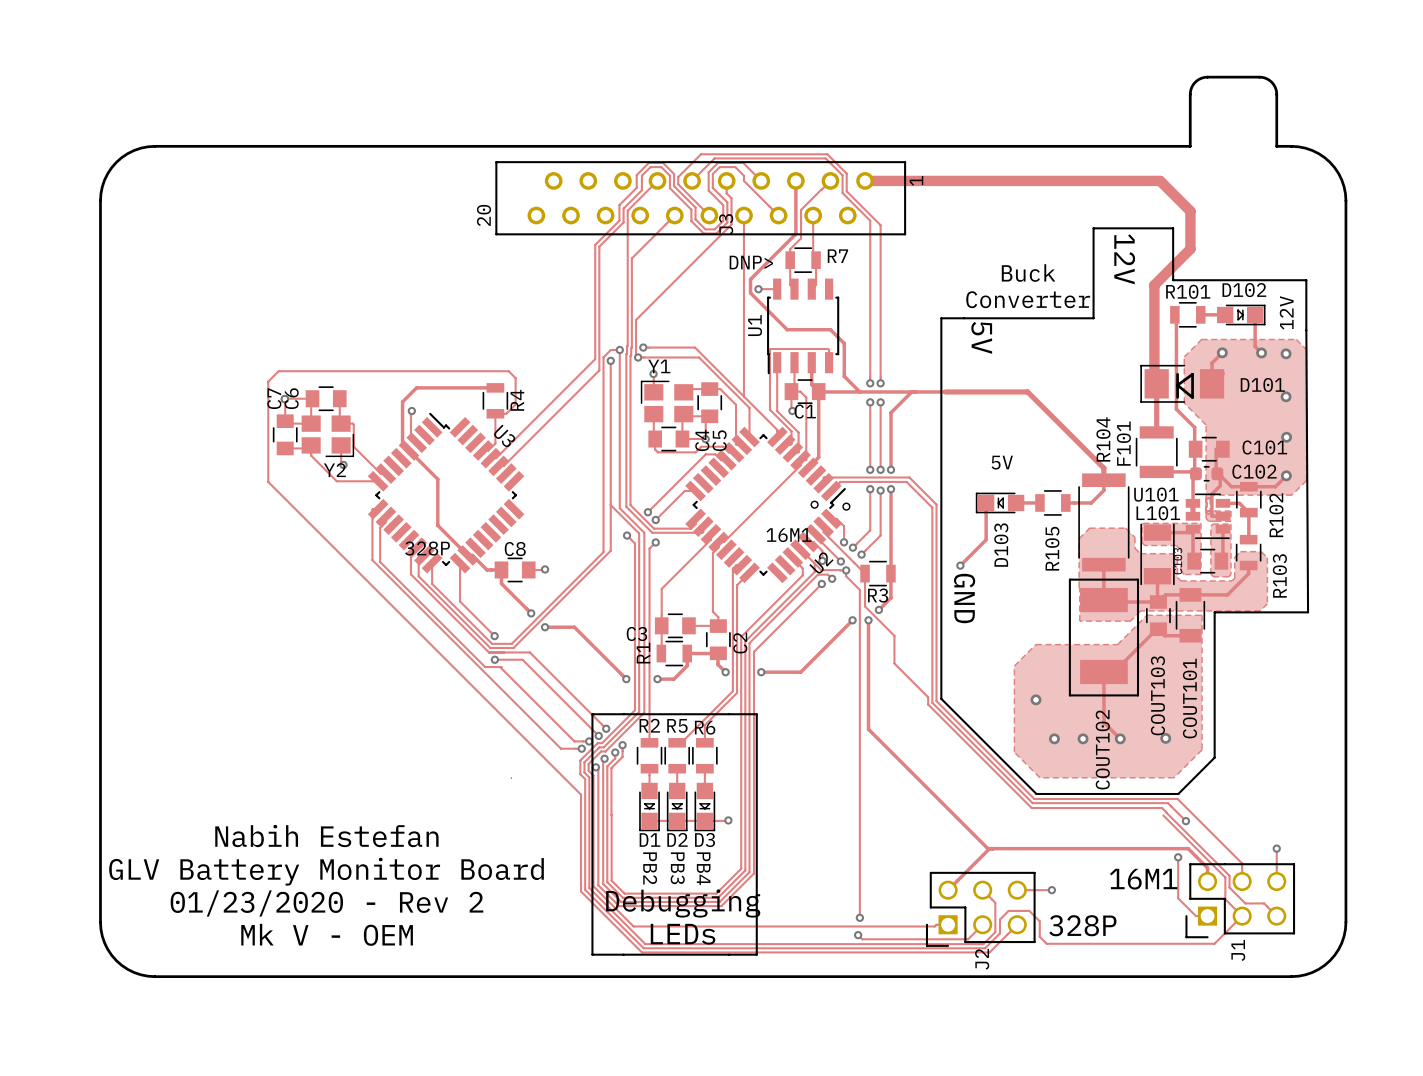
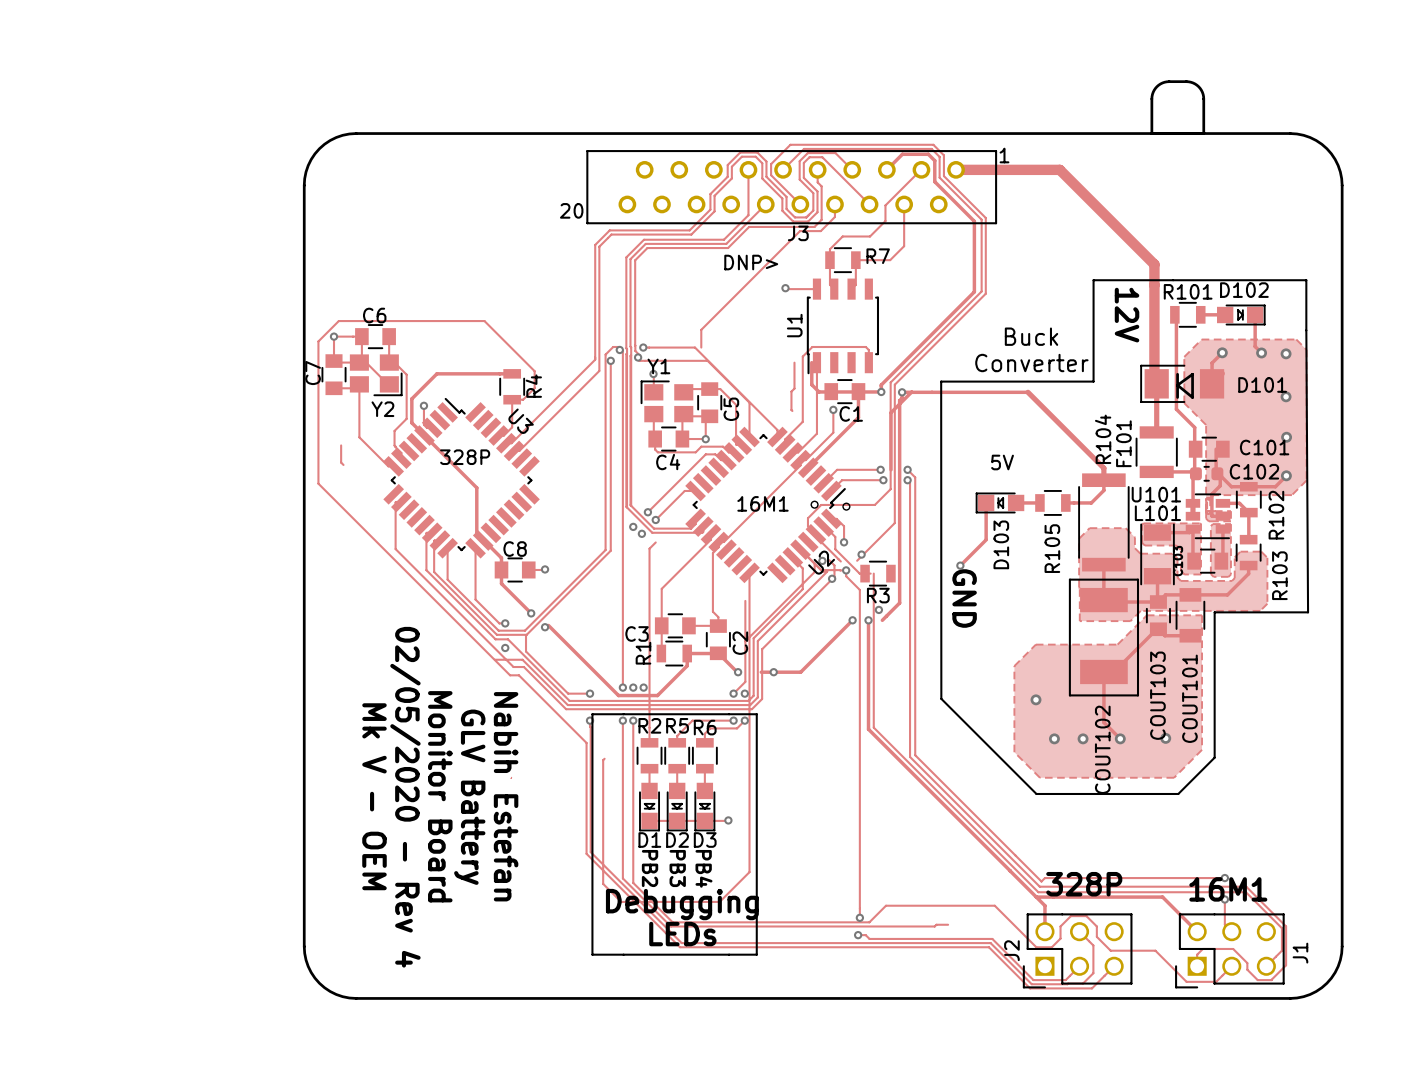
board edge: (1207, 77) (1259, 77) (1269, 80) (1276, 92) (1276, 146) (1305, 148) (1324, 157) (1338, 173) (1345, 193) (1345, 922) (1344, 936) (1338, 949) (1324, 965) (1312, 972) (1291, 976) (154, 976) (140, 974) (127, 969) (111, 955) (102, 936) (100, 922) (100, 200) (104, 179) (111, 167) (121, 157) (140, 148) (154, 146) (1190, 146) (1190, 89) (1197, 80) (1207, 77) -> (356, 133) (336, 137) (319, 148) (308, 165) (304, 185) (304, 946) (308, 966) (314, 978) (324, 987) (342, 996) (356, 998) (1290, 998) (1303, 996) (1316, 991) (1331, 978) (1340, 959) (1342, 946) (1342, 185) (1340, 172) (1335, 159) (1321, 144) (1310, 137) (1290, 133) (356, 133)
board edge: none -> (1151, 133) (1152, 94) (1158, 85) (1169, 81) (1190, 82) (1201, 90) (1203, 98) (1203, 133)
track: none -> (783, 169) (803, 148) (931, 148) (939, 156) (939, 177) (981, 219) (981, 291) (890, 382) (890, 489) (874, 504) (821, 504) (807, 518) (807, 526) (815, 534)
track: none -> (817, 169) (817, 182) (821, 186) (821, 219) (814, 226) (749, 226) (728, 248) (647, 248) (635, 260) (635, 345)
track: none -> (886, 169) (902, 154) (928, 154) (934, 160) (934, 181) (974, 221) (974, 291) (881, 384) (880, 391)
track: none -> (921, 169) (885, 205) (885, 221) (870, 236) (842, 236) (829, 249) (829, 284) (834, 289)
track: (657, 180) (627, 210) (627, 349) -> (748, 169) (748, 215) (723, 239) (644, 239) (626, 257) (627, 349)
track: (692, 180) (714, 158) (825, 158) (842, 175) (842, 193) (870, 220) (870, 383) -> none
track: (726, 180) (726, 193) (731, 198) (731, 224) (636, 320) (636, 355) (638, 357) (699, 357) (749, 407) -> (635, 345) (639, 360) (707, 360) (749, 402) (749, 407)
track: (761, 180) (743, 162) (718, 162) (708, 172) (708, 190) (723, 205) (723, 220) (714, 229) (705, 229) (695, 219) (695, 207) (674, 186) (674, 173) (663, 162) (648, 162) (636, 175) (636, 187) (619, 205) (619, 220) (609, 230) -> (852, 169) (835, 153) (807, 153) (799, 161) (799, 179) (813, 193) (813, 210) (806, 217) (794, 217) (786, 208) (786, 196) (766, 176) (766, 161) (757, 152) (740, 152) (727, 165) (727, 176) (710, 194) (710, 209) (689, 230) (609, 230)
track: (795, 180) (795, 234) (750, 279) (750, 293) (787, 329) (830, 329) (844, 343) (844, 376) (859, 391) -> none
track: (830, 180) (801, 209) (801, 238) (790, 249) (790, 284) (794, 289) -> none
track: (865, 180) (1160, 180) (1190, 211) (1190, 249) (1154, 285) -> (956, 169) (1059, 169) (1154, 264) (1154, 285)
J3 text rotation: 0° (916, 180) -> 90° clockwise (1004, 155)
J3 position: (700, 198) -> (791, 187)
track: none -> (800, 204) (771, 175) (771, 164) (790, 144) (933, 144) (943, 155) (943, 176) (985, 217) (985, 293) (894, 384) (894, 523) (857, 560)
track: none -> (834, 204) (834, 216) (820, 231) (800, 231) (701, 329) (701, 347)
track: none -> (904, 204) (904, 246) (890, 260) (855, 260)
J3 text rotation: 0° (483, 215) -> 90° clockwise (571, 210)
track: (674, 215) (631, 258) (631, 348) -> (765, 204) (726, 243) (645, 243) (630, 259) (631, 348)
track: (709, 215) (678, 184) (678, 177) (701, 154) (827, 154) (846, 173) (846, 191) (880, 225) (880, 383) -> none
track: (743, 215) (743, 396) -> none
track: (778, 215) (743, 180) (743, 175) (735, 167) (719, 167) (712, 174) (712, 187) (727, 202) (727, 222) (716, 233) (703, 233) (691, 221) (691, 209) (669, 188) (669, 175) (661, 167) (650, 167) (641, 175) (641, 190) (623, 208) (623, 222) (611, 234) -> (869, 204) (822, 157) (809, 157) (803, 162) (803, 177) (817, 191) (817, 212) (808, 221) (793, 221) (782, 210) (782, 198) (762, 178) (762, 163) (755, 156) (741, 156) (731, 166) (731, 178) (714, 195) (714, 211) (691, 234) (611, 234)
track: (813, 215) (813, 257) (816, 260) (816, 284) (811, 289) -> none
J3 name rotation: 0° (726, 224) -> 90° clockwise (798, 233)
text position: 12V (1124, 259) -> 12V (1127, 315)
R7 position: (803, 260) -> (842, 260)
track: none -> (855, 260) (855, 284) (851, 289)
text position: Buck (1028, 273) -> Buck (1031, 336)
line: (1093, 280) (1093, 228) (1173, 228) (1173, 280) -> (1093, 280) (1173, 280)
track: none -> (785, 288) (816, 289)
track: (758, 289) (777, 289) -> none
via position: (758, 289) -> (785, 288)
text position: Converter (1028, 299) -> Converter (1031, 363)
text: 12V (1286, 312) -> none
line: (1093, 318) (941, 318) (941, 698) -> (1093, 318) (1093, 381) (941, 381) (941, 698)
U1 position: (803, 326) -> (842, 326)
via: none -> (334, 336)
track: none -> (389, 336) (389, 362) (394, 362) (406, 374) (406, 418) (394, 430) (394, 445) (401, 452) (401, 458)
text: 5V (981, 337) -> none
track: (595, 359) (496, 458) (490, 458) -> (595, 359) (511, 443) (506, 443)
track: none -> (359, 362) (361, 360) (361, 336) (334, 336) (335, 362) (366, 362) (389, 384)
track: (777, 362) (777, 411) (798, 432) (798, 451) -> (816, 362) (816, 433) (798, 451)
track: (829, 362) (828, 349) (769, 349) (769, 409) (791, 431) (791, 443) (785, 444) -> (868, 362) (868, 350) (865, 346) (812, 346) (802, 356) (802, 421) (785, 439) (785, 444)
track: (599, 370) (503, 465) (498, 465) -> (599, 370) (519, 450) (514, 450)
via: (870, 383) -> none
via: (880, 383) -> none
track: (495, 387) (416, 387) (402, 401) (402, 444) (437, 479) (437, 525) (467, 555) (472, 555) (487, 569) (501, 569) -> (512, 373) (436, 373) (411, 398) (411, 422) (476, 487) (476, 534) (501, 558) (501, 569)
track: none -> (334, 388) (355, 388) (359, 384) (359, 437) (388, 466) (393, 466)
track: (791, 391) (800, 391) (806, 397) (806, 459) -> (833, 409) (833, 432) (806, 459)
C1 position: (805, 391) -> (844, 391)
track: (818, 391) (818, 457) -> (858, 391) (858, 417) (818, 457)
track: (881, 391) (1028, 392) -> (882, 620) (899, 603) (899, 400) (902, 398) (902, 392) (1028, 392)
via: none -> (881, 391)
via: none -> (902, 392)
C7 name position: C7 (274, 398) -> C7 (313, 373)
track: (285, 398) (285, 421) (287, 423) (311, 423) (312, 398) (285, 398) -> none
C6 name rotation: 0° (291, 398) -> 90° clockwise (374, 315)
C6 name position: C6 (291, 398) -> C6 (374, 315)
C6 position: (326, 398) -> (375, 336)
track: (339, 398) (339, 422) (353, 424) (353, 446) (380, 473) (385, 473) -> none
via: (284, 399) -> none
R4 position: (495, 400) -> (512, 386)
track: (870, 402) (870, 469) -> none
via: (870, 402) -> none
track: (880, 402) (880, 469) -> none
via: (880, 402) -> none
track: none -> (423, 405) (423, 424) (426, 427) (432, 427)
via: none -> (833, 409)
track: (411, 411) (410, 436) (416, 442) -> none
via position: (411, 411) -> (423, 405)
via: (792, 411) -> none
C1 name position: C1 (805, 411) -> C1 (851, 413)
C7 position: (285, 434) -> (334, 374)
track: none -> (498, 435) (503, 435) (512, 427) (512, 399) (523, 399) (534, 388) (534, 371) (484, 321) (338, 321) (318, 341) (318, 483) (510, 675) (518, 675) (586, 742) (586, 853) (679, 947) (988, 947) (1030, 988) (1092, 988) (1114, 966)
Y2 position: (327, 436) -> (376, 375)
C4 name rotation: 0° (702, 440) -> 90° clockwise (668, 462)
C4 name position: C4 (702, 440) -> C4 (668, 462)
C5 name position: C5 (719, 440) -> C5 (731, 409)
track: (285, 448) (308, 448) (311, 445) (311, 455) (336, 481) (378, 481) -> none
track: (483, 450) (488, 450) (495, 443) (495, 413) (506, 413) (515, 404) (515, 378) (508, 371) (278, 371) (268, 381) (268, 481) (581, 794) (581, 891) (641, 952) (989, 952) (1017, 924) -> none
via: (343, 464) -> none
via: (870, 469) -> none
via: (891, 469) -> none
track: none -> (907, 469) (915, 477) (915, 755) (1041, 881) (1044, 878) (1224, 878)
via: none -> (907, 469)
via: none -> (883, 480)
track: none -> (907, 480) (910, 482) (910, 756) (1039, 886) (1246, 886) (1286, 926) (1286, 965) (1271, 980) (1257, 980) (1247, 969) (1247, 963) (1233, 948) (1202, 948) (1197, 954) (1197, 966)
via: none -> (907, 480)
track: (840, 481) (906, 481) (932, 507) (932, 702) (1032, 803) (1167, 803) (1185, 821) -> (840, 481) (842, 480) (883, 480)
track: (823, 483) (824, 477) (909, 477) (936, 504) (936, 701) (1034, 799) (1177, 799) (1242, 863) (1242, 881) -> (823, 483) (837, 469) (883, 469)
track: (870, 489) (870, 530) (852, 547) -> none
via: (870, 489) -> none
track: (891, 489) (891, 573) -> none
via: (891, 489) -> none
track: (880, 490) (880, 535) (861, 554) -> none
via: (880, 490) -> none
U3 position: (446, 493) -> (461, 478)
track: none -> (401, 501) (395, 502) (395, 549) (513, 667) (523, 667) (566, 709) (751, 709) (762, 699) (762, 649) (834, 576) (834, 565) (829, 560)
track: (610, 505) (639, 533) (639, 711) (603, 747) (599, 747) (584, 762) (584, 772) (589, 777) (589, 888) (645, 944) (983, 944) (995, 932) (995, 902) (982, 890) -> none
track: (378, 509) (372, 509) (372, 560) (561, 748) (581, 748) -> none
track: (385, 516) (385, 522) (380, 527) (380, 561) (485, 667) (501, 667) -> none
via: none -> (633, 526)
track: (823, 526) (823, 532) (865, 573) (865, 606) (894, 635) (894, 663) (928, 697) (928, 704) (1031, 807) (1162, 807) (1229, 875) (1229, 887) (1245, 903) (1264, 903) (1276, 916) -> (823, 526) (835, 536) (835, 549) (859, 573) (870, 573)
via: none -> (641, 533)
track: (627, 535) (634, 543) (634, 710) (602, 743) (597, 743) (580, 760) (580, 774) (585, 779) (585, 889) (643, 948) (985, 948) (999, 933) (999, 919) (1008, 910) (1029, 910) (1039, 921) (1039, 936) (1046, 943) (1214, 943) (1242, 916) (1225, 899) (1225, 877) (1163, 815) -> none
via: (627, 535) -> none
text position: 16M1 (789, 535) -> 16M1 (763, 503)
track: none -> (439, 540) (434, 540) (434, 572) (496, 634) (526, 634)
via: (655, 542) -> none
track: (808, 542) (813, 542) (822, 550) (822, 560) -> none
track: (416, 547) (410, 548) (410, 574) (488, 652) (529, 652) (606, 728) -> none
via: (852, 547) -> none
text position: 328P (427, 548) -> 328P (465, 457)
track: none -> (475, 548) (475, 599) (499, 623) (505, 623)
track: (603, 552) (603, 357) (610, 349) (619, 349) (619, 508) (644, 532) (644, 712) (605, 751) (601, 751) (588, 763) (588, 770) (593, 775) (593, 886) (633, 926) (670, 926) -> (622, 720) (622, 878) (670, 926)
track: none -> (603, 552) (605, 550) (605, 354) (613, 346) (619, 346) (622, 350) (622, 687)
track: (424, 555) (418, 555) (418, 576) (490, 647) (513, 647) (526, 635) -> (590, 693) (568, 693) (526, 651) (526, 635)
via: (840, 561) -> none
track: (432, 563) (432, 583) (492, 643) (511, 643) (524, 630) -> (447, 548) (447, 579) (498, 630) (524, 630)
track: (460, 563) (460, 601) (494, 636) -> none
track: (741, 565) (736, 565) (732, 568) (732, 691) (681, 742) -> none
track: (749, 572) (737, 585) (737, 692) (704, 725) (704, 733) -> (744, 720) (737, 728) (710, 728) (704, 733)
track: none -> (873, 573) (873, 727) (1038, 892) (1245, 892) (1281, 928) (1281, 950) (1266, 966)
track: (890, 573) (890, 597) (878, 609) -> none
track: (802, 575) (741, 636) (741, 868) (716, 893) (624, 893) (611, 880) (611, 814) -> (802, 575) (802, 589) (753, 638) (753, 695) (748, 700) (569, 700) (507, 639) (495, 639) (426, 570) (426, 533) (432, 532)
track: (832, 578) (827, 574) (817, 574) (749, 643) -> (749, 572) (749, 643)
track: (821, 583) (754, 651) (754, 873) (721, 906) (619, 906) (598, 885) (598, 769) (595, 767) -> none
via: (821, 583) -> none
via: none -> (505, 623)
track: (545, 627) (574, 627) (626, 679) -> none
via: (494, 636) -> none
via: none -> (505, 647)
track: (718, 653) (718, 664) (725, 672) -> (718, 653) (738, 672)
via: (494, 659) -> none
track: (500, 667) (574, 741) (589, 741) -> none
via: (725, 672) -> none
via: none -> (738, 672)
via: (761, 672) -> none
via: none -> (773, 672)
via: (626, 679) -> none
track: (657, 679) (673, 679) -> (548, 625) (618, 695) (657, 695) (673, 679)
via: (657, 679) -> none
track: (745, 681) (745, 870) (718, 897) (622, 897) (607, 882) (607, 766) (615, 758) (615, 752) -> (745, 681) (733, 693)
via: none -> (622, 687)
via: none -> (633, 687)
via: none -> (643, 687)
via: none -> (590, 693)
via: none -> (733, 693)
via: none -> (744, 693)
track: (567, 705) (598, 735) -> (567, 705) (750, 705) (757, 697) (757, 641) (827, 571) (822, 571) (800, 549)
track: none -> (590, 720) (590, 852) (681, 943) (990, 943) (1031, 984) (1067, 984) (1083, 983) (1093, 973) (1093, 945) (1079, 931)
via: none -> (590, 720)
via: none -> (622, 720)
track: none -> (633, 720) (633, 882) (672, 922) (869, 922) (886, 905) (994, 905) (1036, 947) (1051, 947) (1060, 938) (1060, 926) (1070, 916) (1086, 916) (1096, 926) (1096, 936) (1110, 950) (1155, 950) (1186, 981) (1216, 981) (1231, 966)
via: none -> (633, 720)
track: none -> (733, 720) (692, 720) (677, 735) (677, 742)
via: none -> (733, 720)
via: none -> (744, 720)
via: (606, 728) -> none
track: (868, 729) (987, 848) (1188, 848) (1207, 868) (1207, 881) -> (868, 729) (1044, 905) (1044, 931)
via: (598, 735) -> none
via: (589, 741) -> none
track: (622, 745) (622, 756) (611, 768) (611, 814) -> none
via: (622, 745) -> none
via: (581, 748) -> none
via: (615, 752) -> none
via: (604, 758) -> none
via: (595, 767) -> none
text: none -> Monitor Board (440, 796)
text: none -> GLV Battery (469, 797)
via: (1185, 821) -> none
text rotation: 0° (326, 836) -> 90° clockwise (506, 796)
track: (989, 848) (948, 890) -> none
track: (1276, 848) (1276, 881) -> none
via: (1276, 848) -> none
track: (1178, 857) (1178, 898) (1195, 916) (1207, 916) -> none
via: (1178, 857) -> none
text: GLV Battery Monitor Board (326, 871) -> none
via: none -> (1224, 878)
text position: 16M1 (1143, 879) -> 16M1 (1228, 889)
track: (1017, 890) (1051, 890) -> none
via: (1051, 890) -> none
track: none -> (1036, 897) (1162, 897) (1197, 931)
track: none -> (1224, 899) (1224, 924) (1231, 931)
via: none -> (1224, 899)
J1 position: (1240, 900) -> (1229, 950)
text: 01/23/2020 - Rev 2 (326, 903) -> 02/05/2020 - Rev 4 (405, 797)
J2 position: (980, 909) -> (1077, 950)
track: (982, 924) (968, 939) (862, 939) (858, 935) -> none
text position: 328P (1082, 925) -> 328P (1084, 884)
text rotation: 0° (327, 934) -> 90° clockwise (374, 796)
track: none -> (859, 935) (865, 935) (869, 938) (992, 938) (1033, 980) (1065, 980) (1079, 966)
J1 name position: J1 (1238, 950) -> J1 (1300, 953)
J2 name position: J2 (982, 959) -> J2 (1011, 950)

